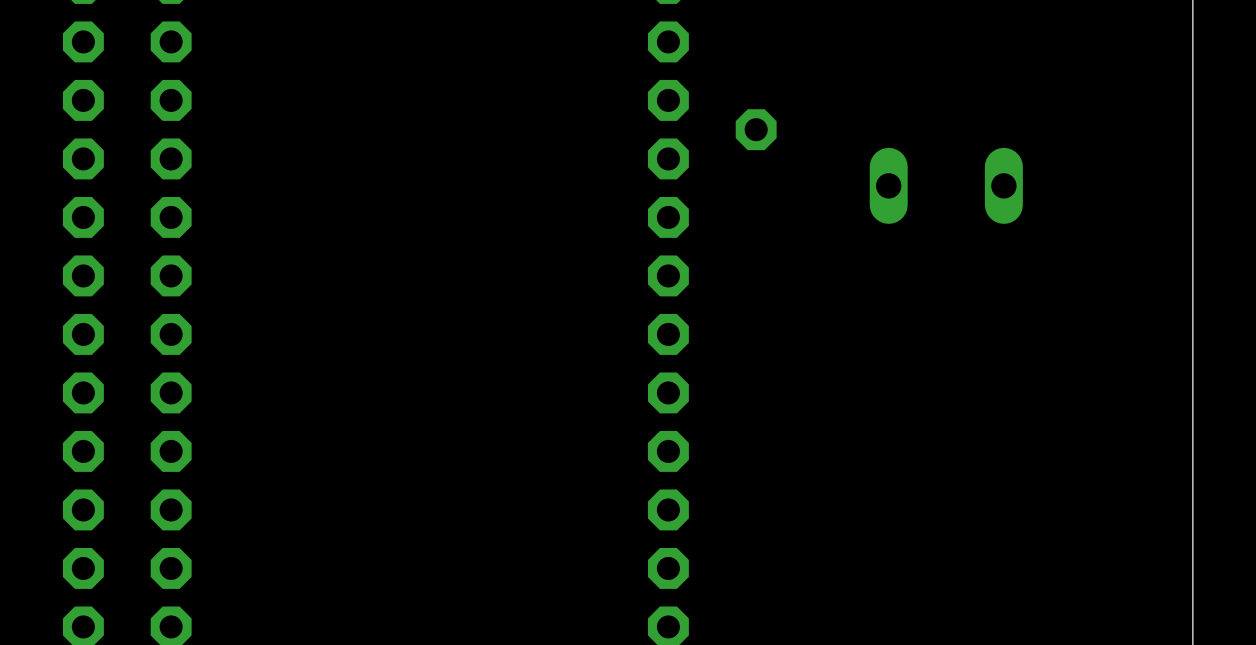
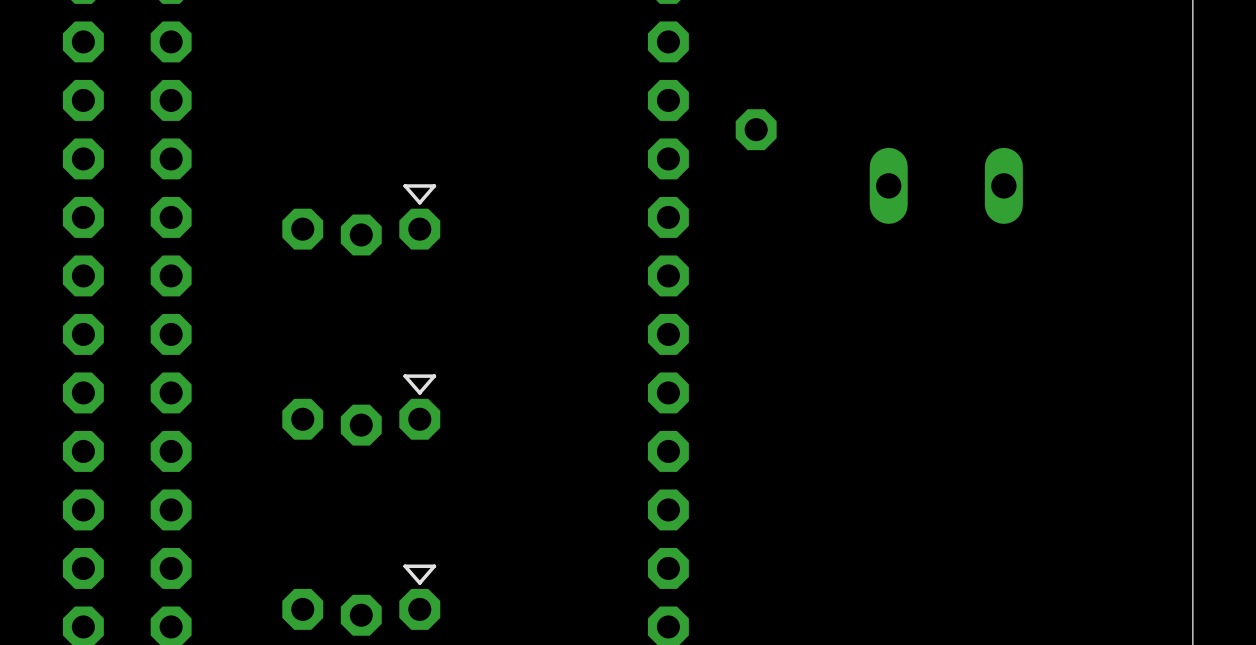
part: none -> (361, 219)
part: none -> (361, 409)
part: none -> (361, 600)

